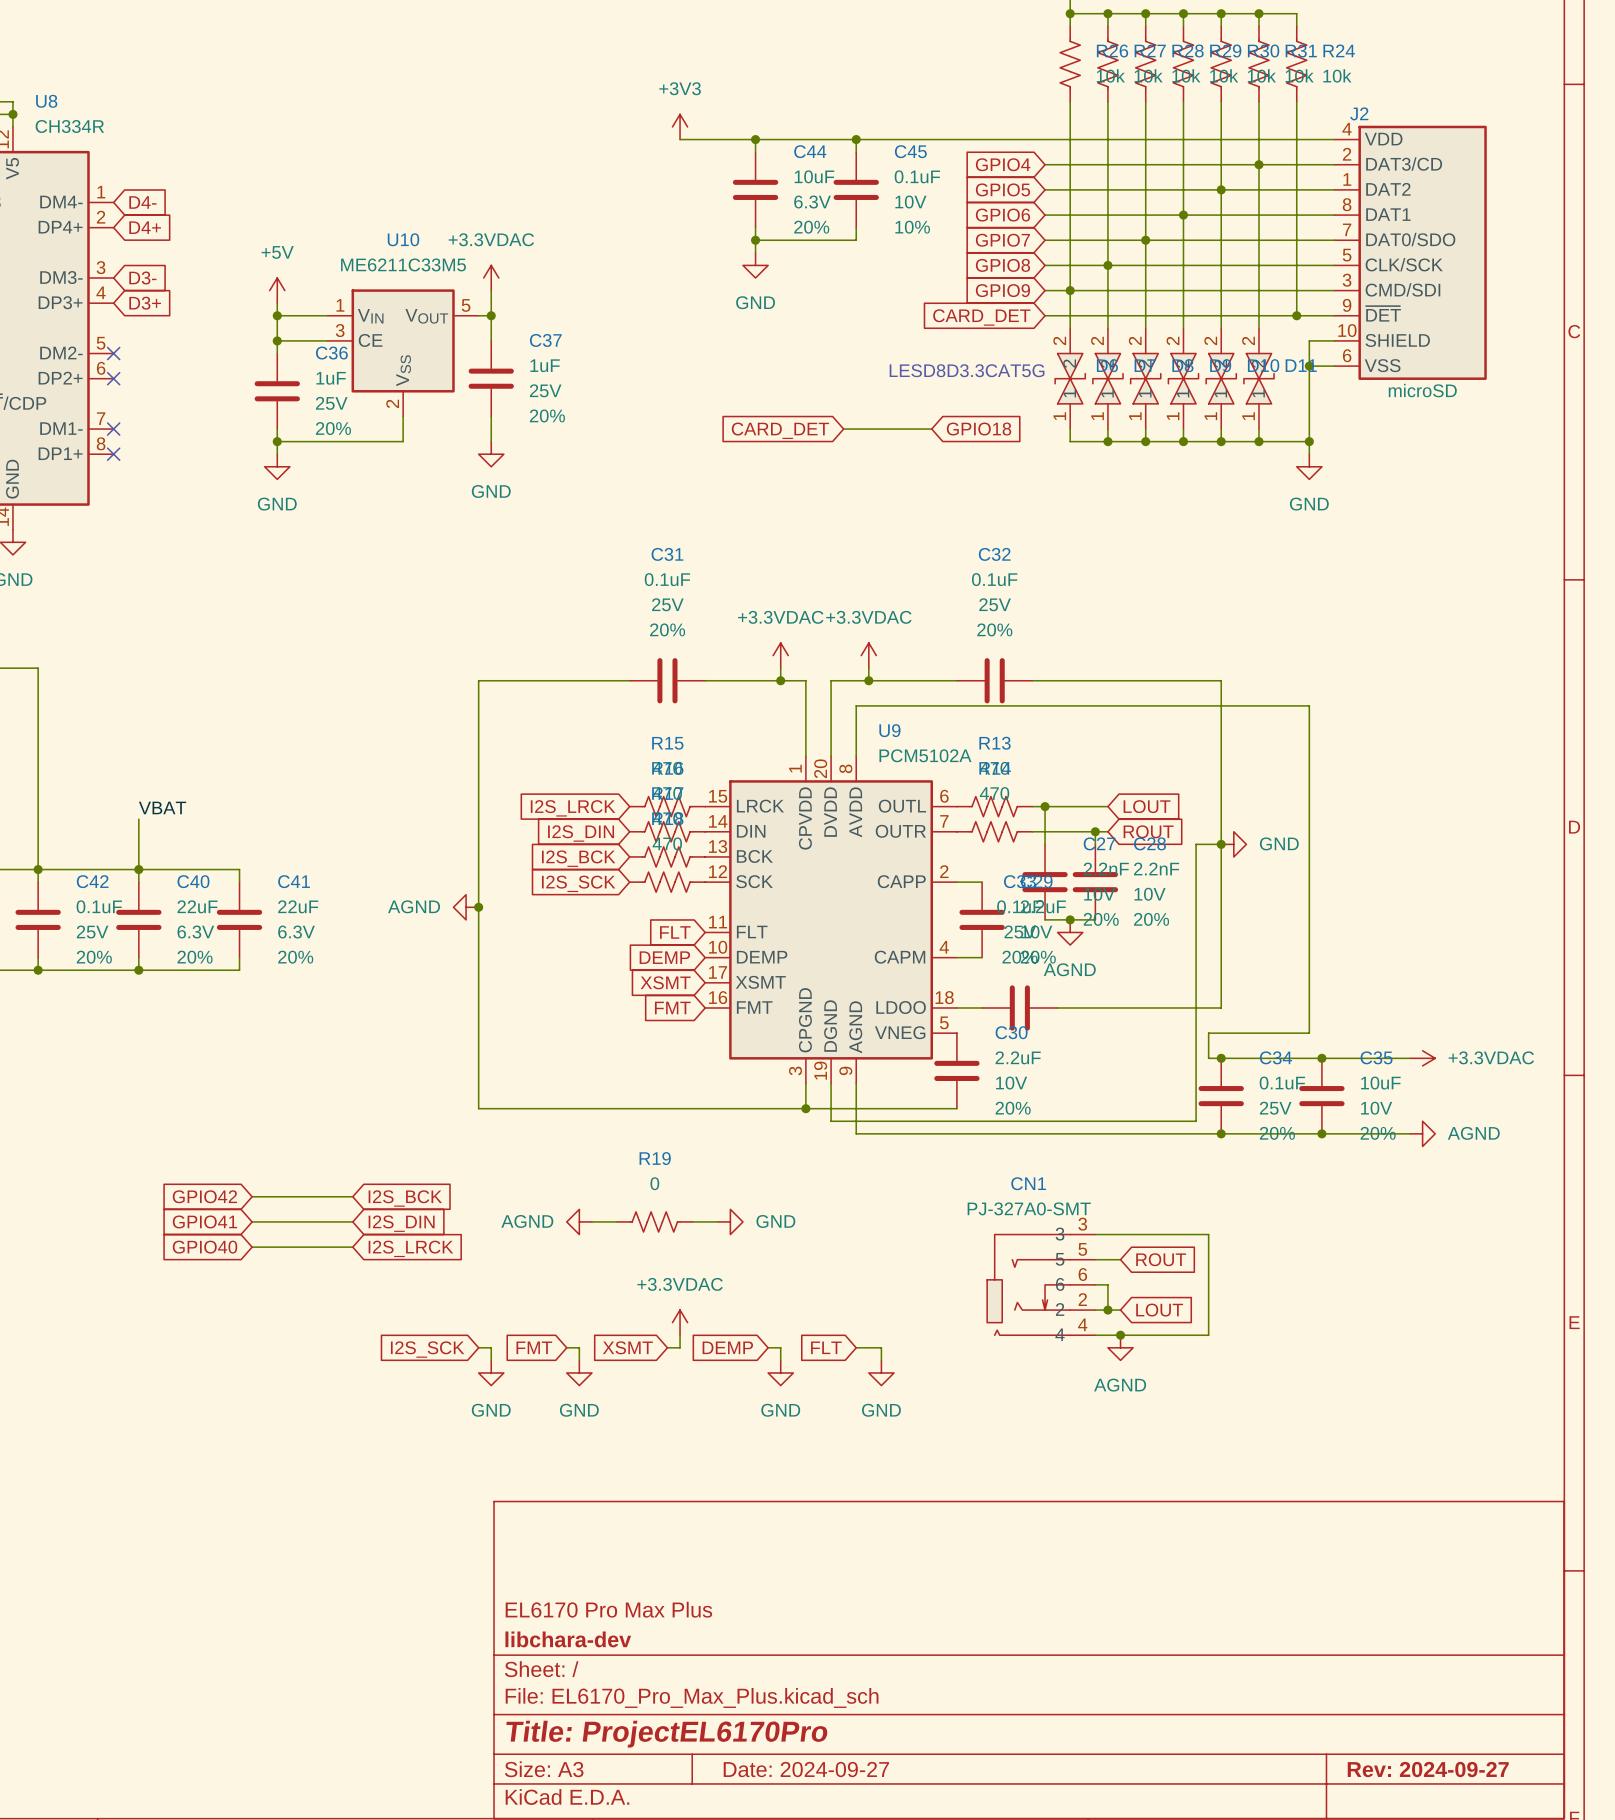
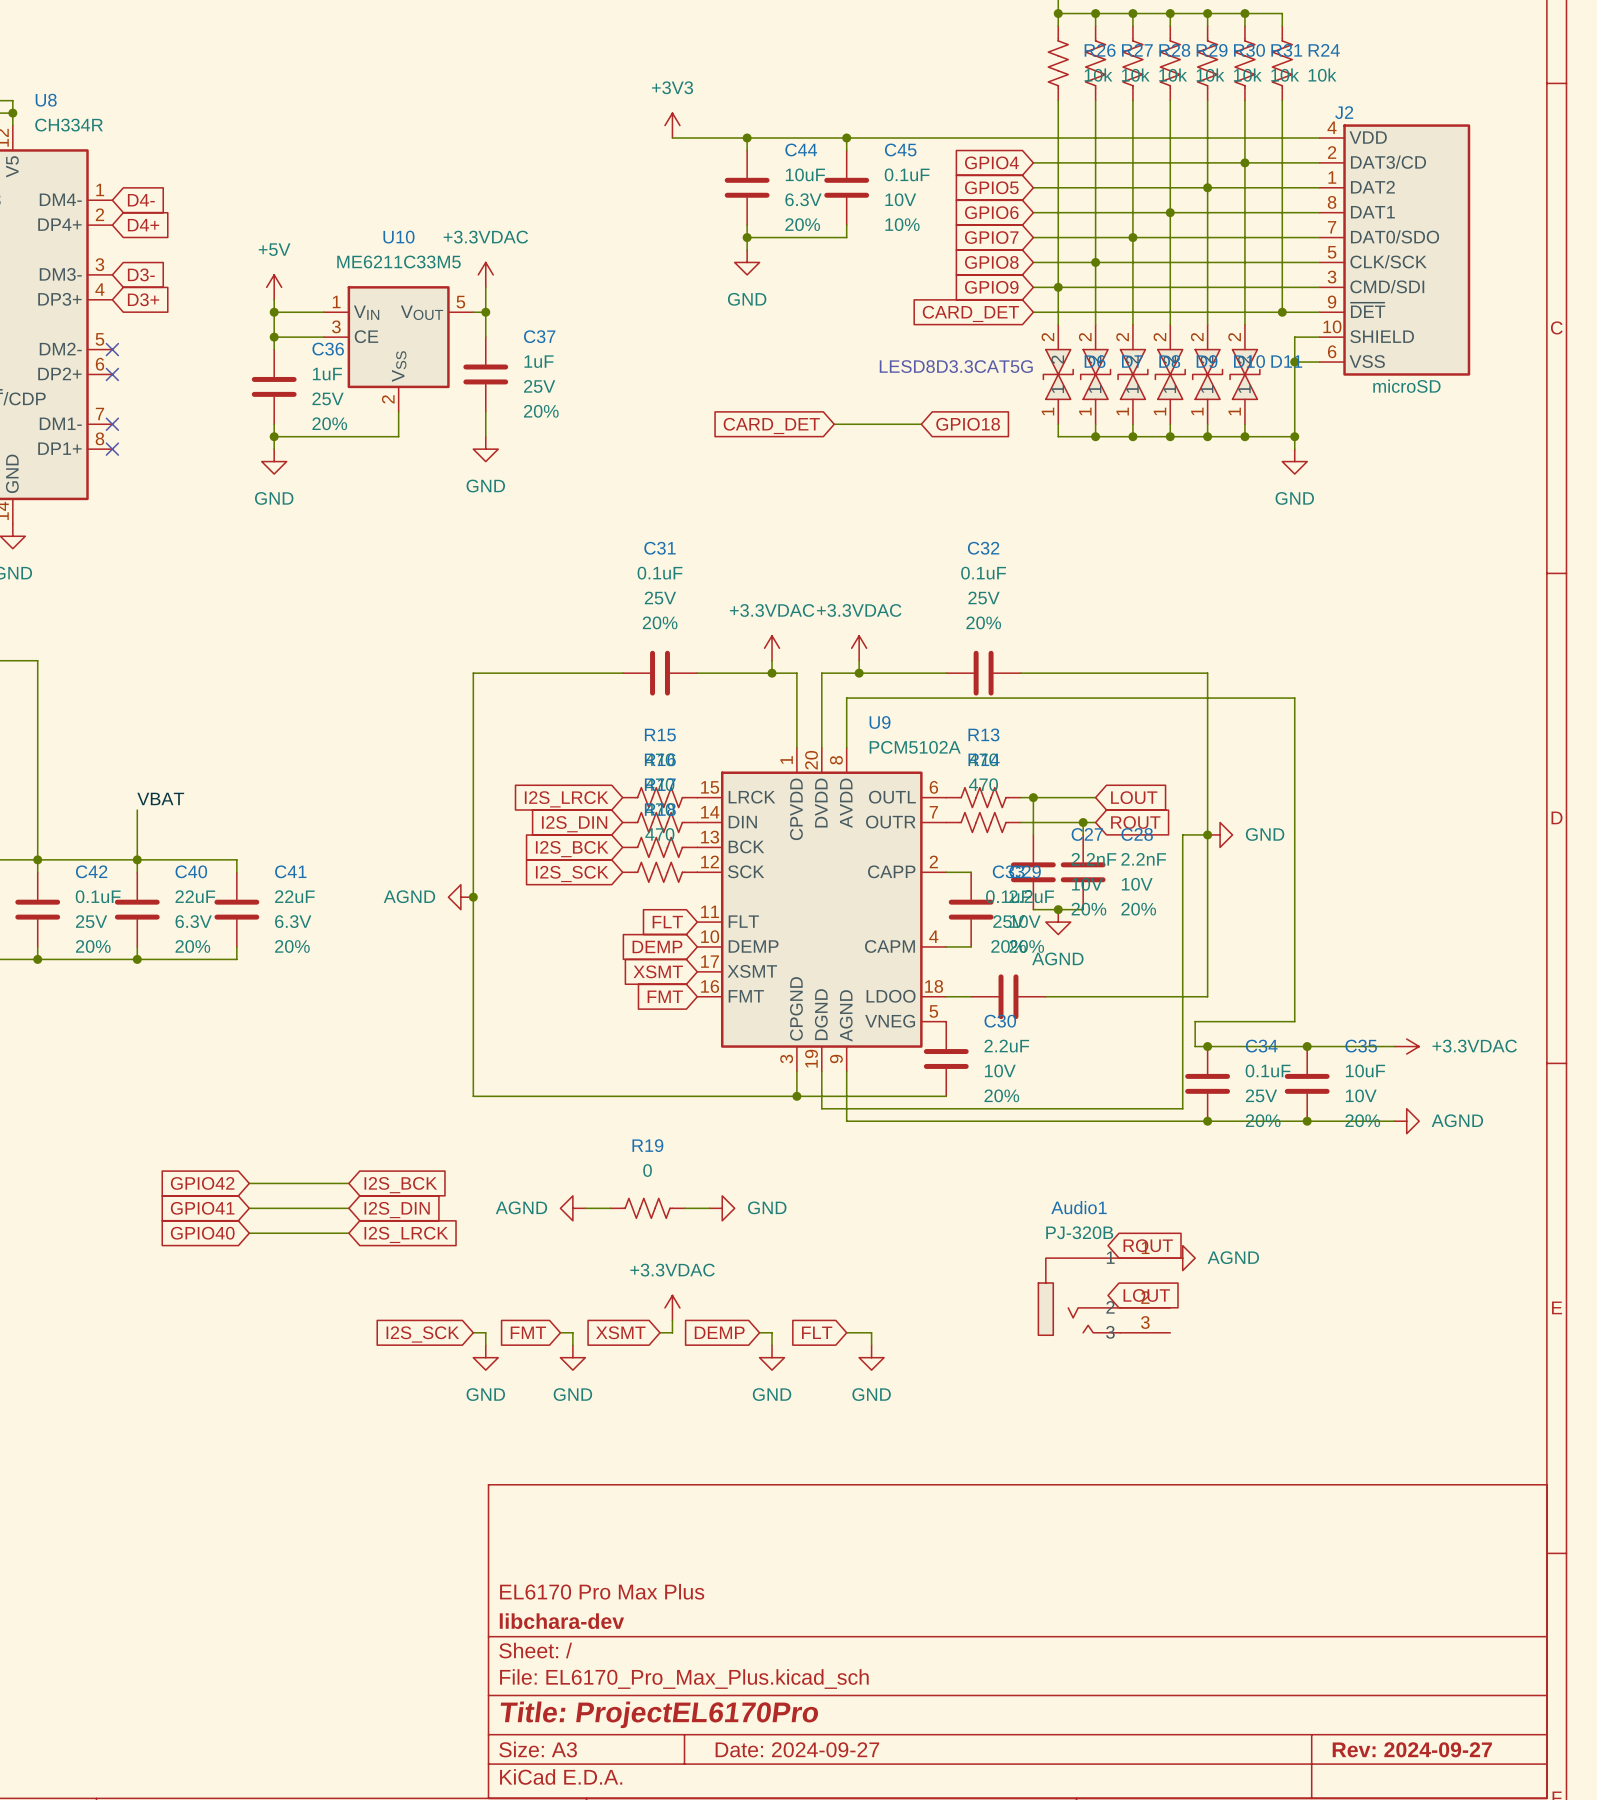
wire: (1095, 1234) (1208, 1234) (1208, 1335) (1095, 1335) -> none
wire: (1095, 1259) (1120, 1259) -> none
CN1: PJ-327A0-SMT (1041, 1284) -> none
wire: (1095, 1284) (1107, 1284) (1107, 1310) -> none
wire: (1095, 1310) (1120, 1310) -> none
junction: (1107, 1310) -> none
Audio1: none -> PJ-320B (1104, 1296)
junction: (1120, 1335) -> none
power symbol rotation: 0° (1120, 1347) -> 90° counterclockwise (1182, 1258)
power symbol position: AGND (1120, 1347) -> AGND (1182, 1258)

